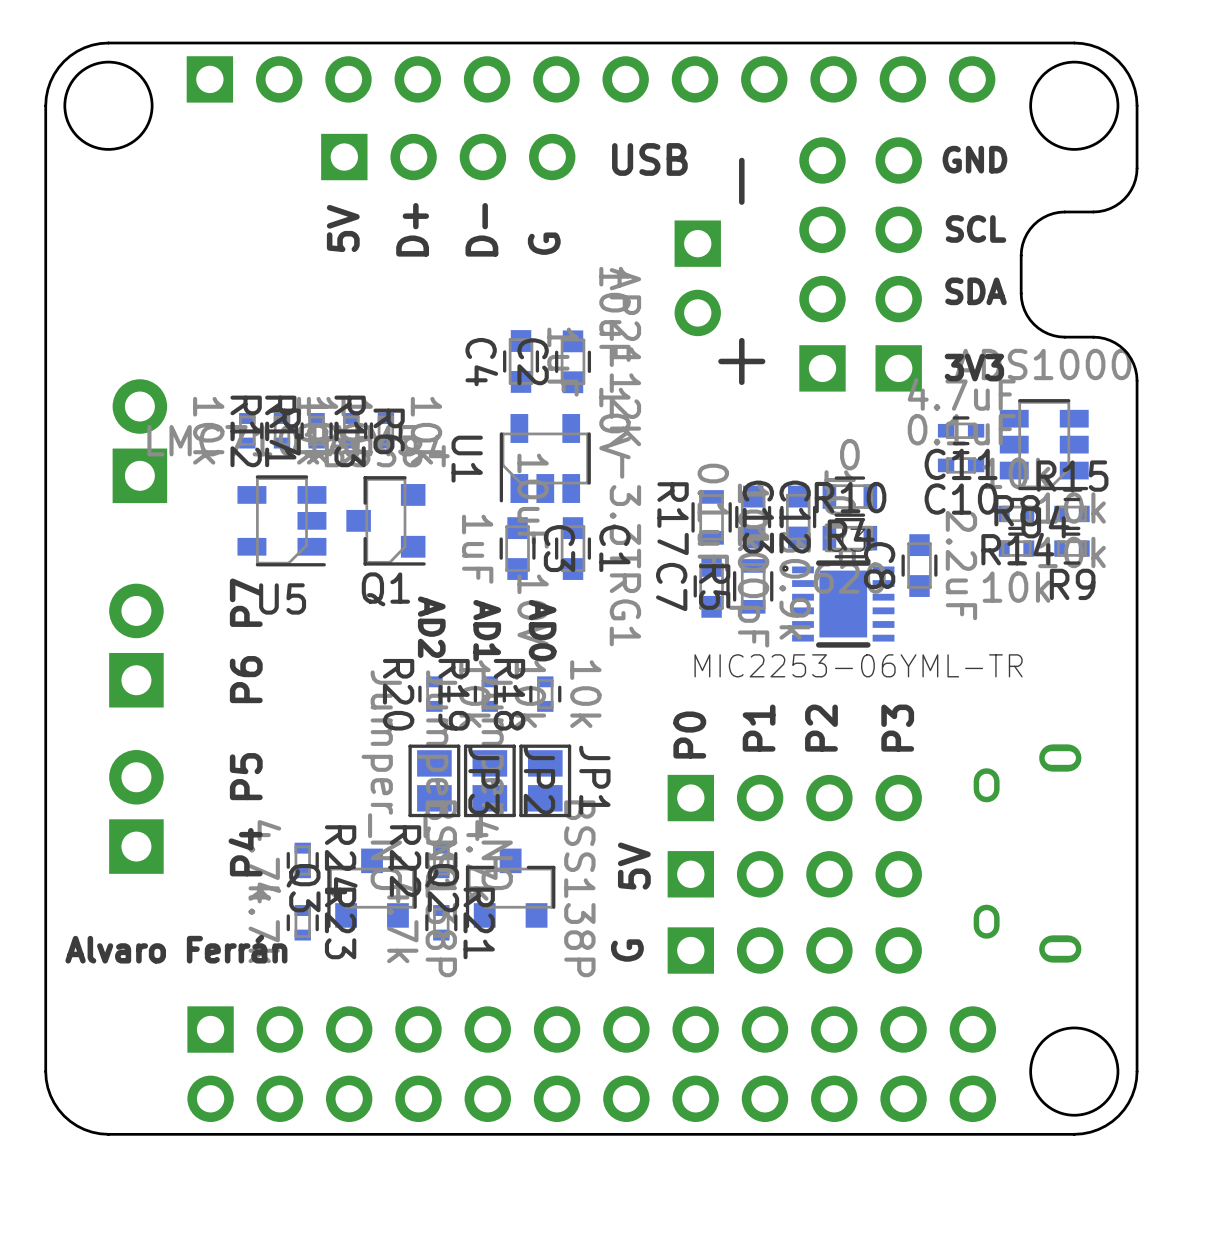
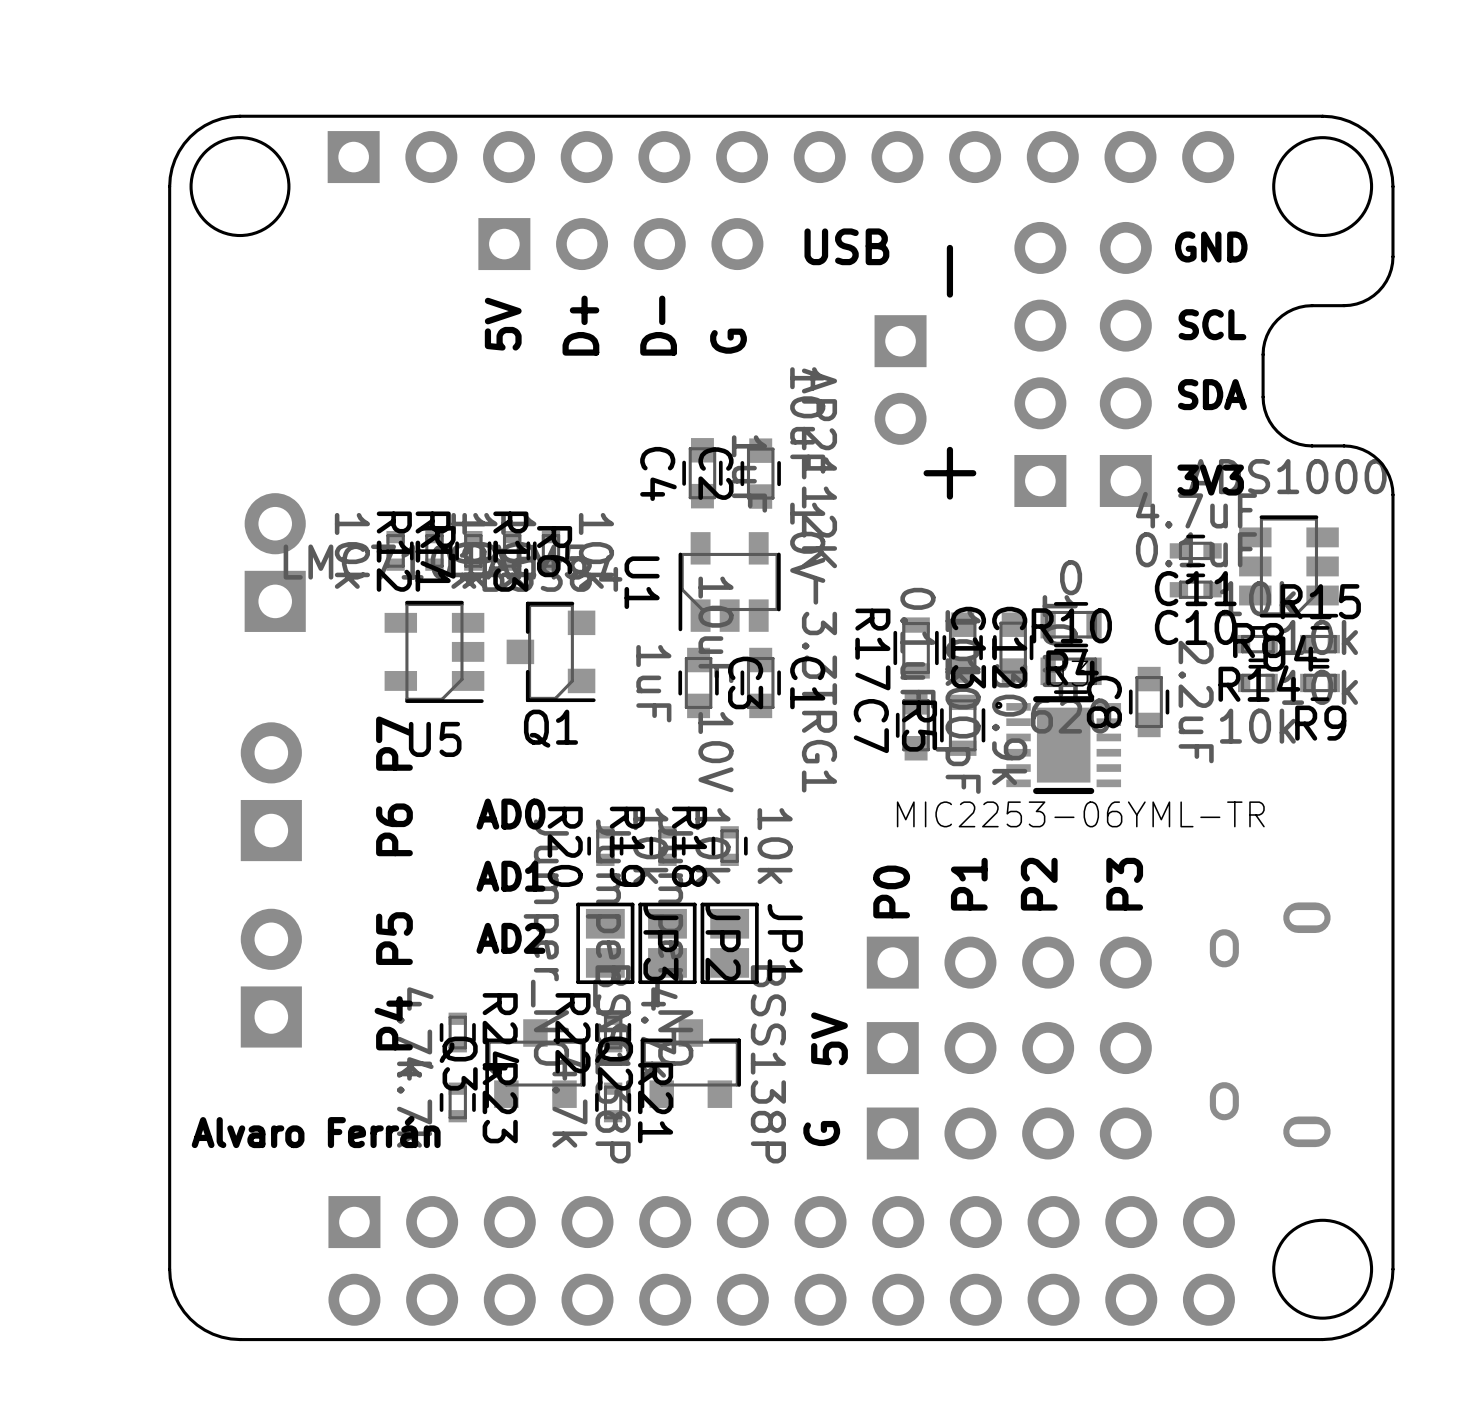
text rotation: 0° (431, 627) -> 90° counterclockwise (510, 938)
text position: AD2 (431, 627) -> AD2 (510, 938)
text rotation: 0° (487, 630) -> 90° counterclockwise (510, 876)
text position: AD1 (487, 630) -> AD1 (510, 876)
text rotation: 0° (542, 630) -> 90° counterclockwise (510, 814)
text position: AD0 (542, 630) -> AD0 (510, 814)

